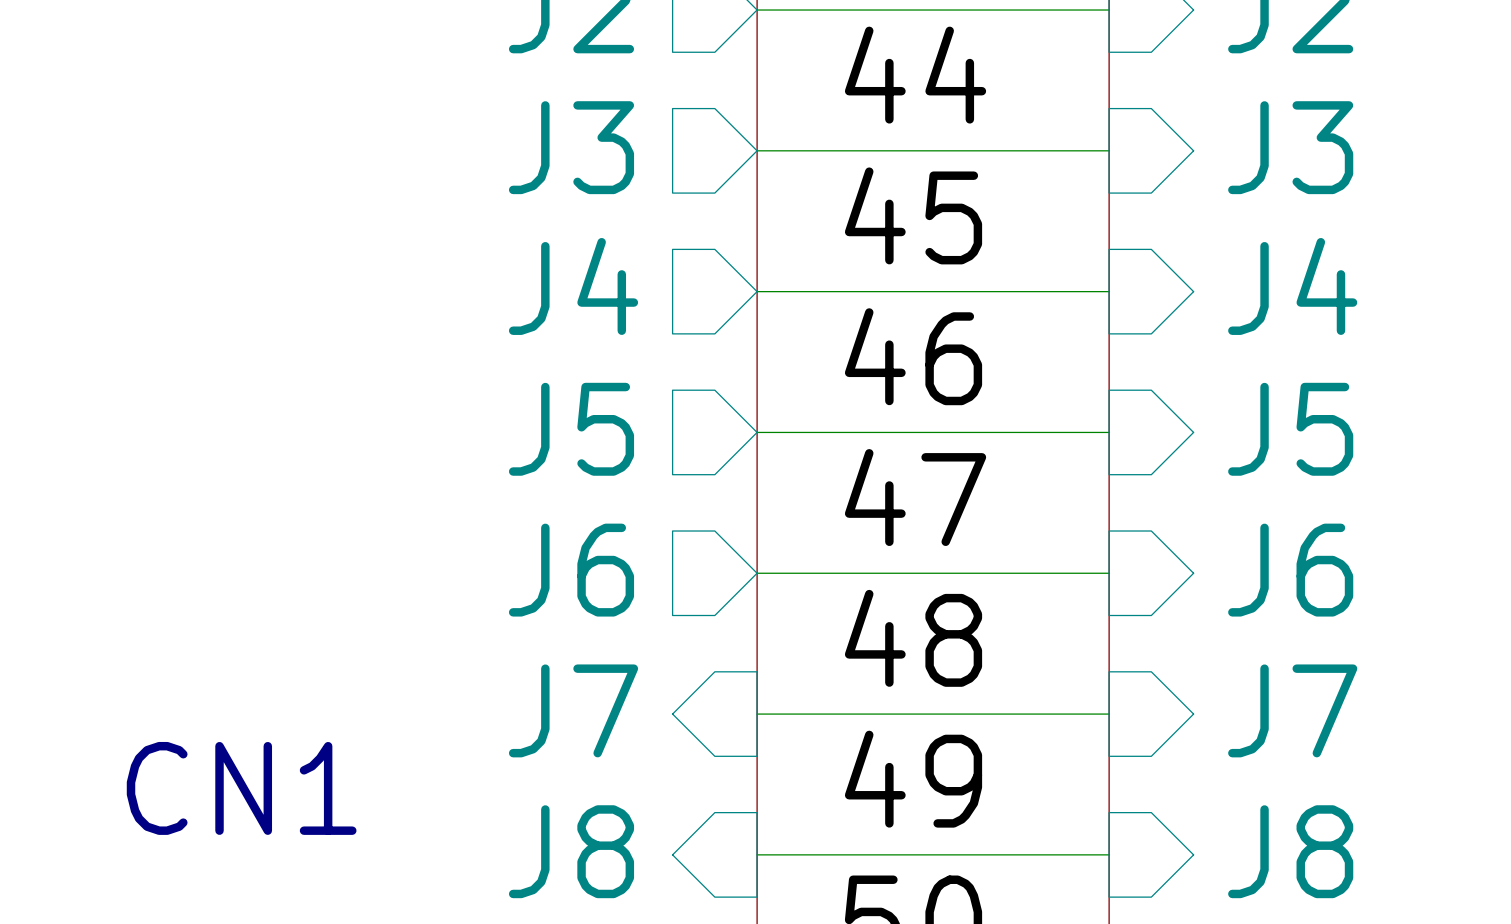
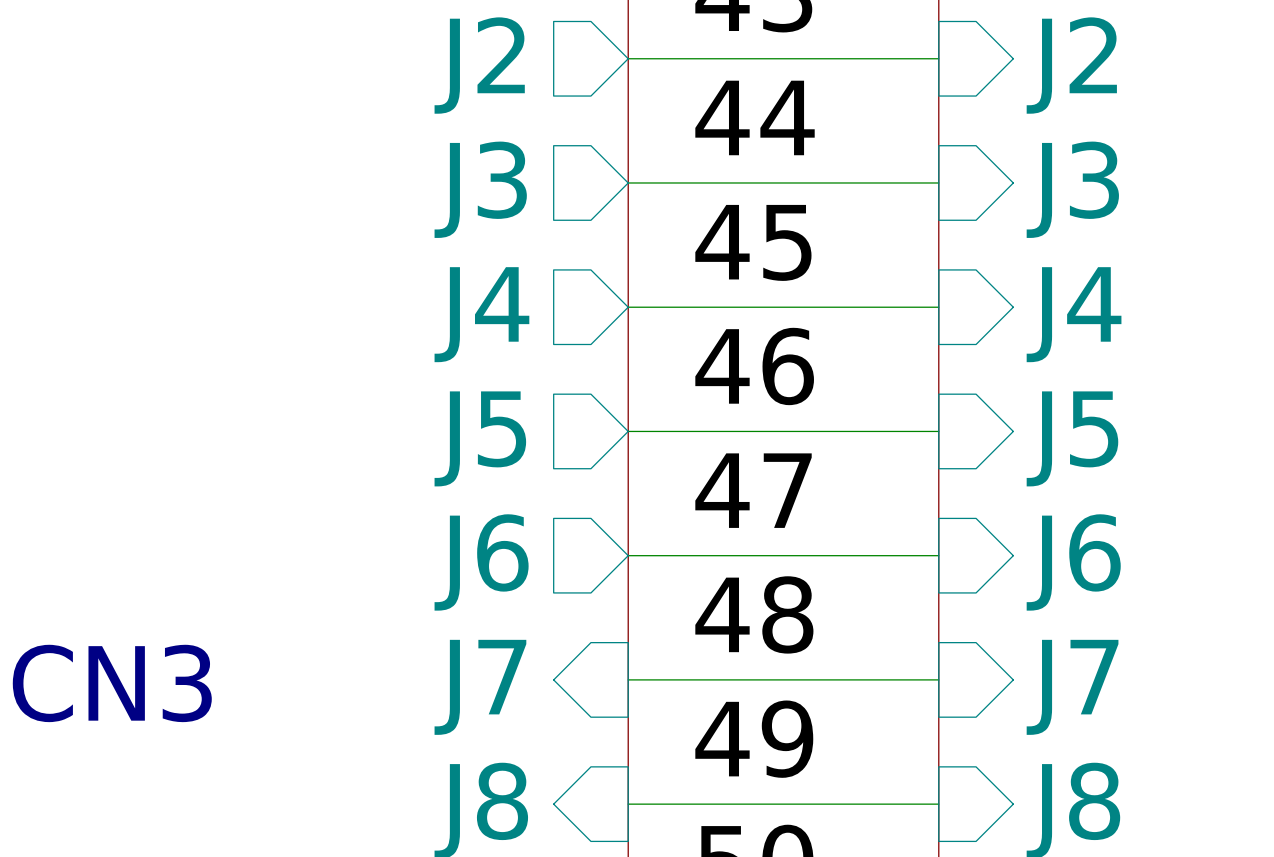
text: CN1 (241, 788) -> CN3 (112, 683)

